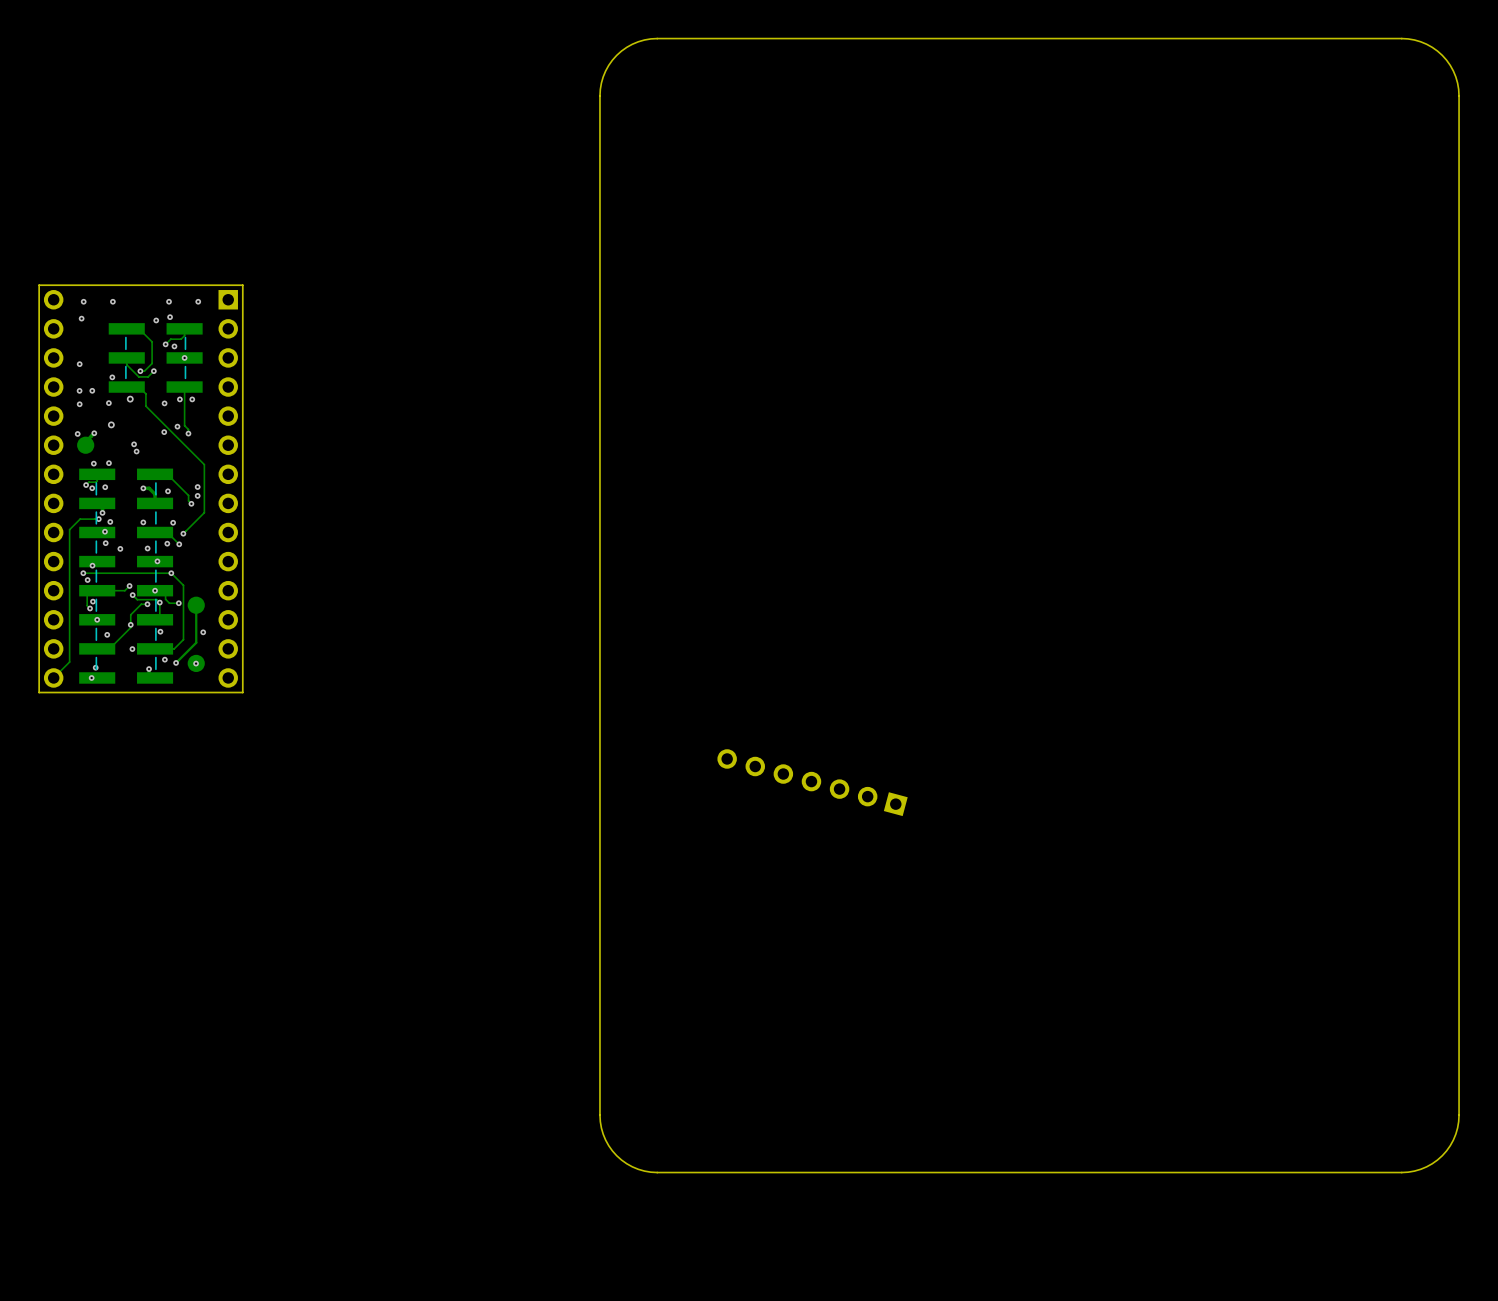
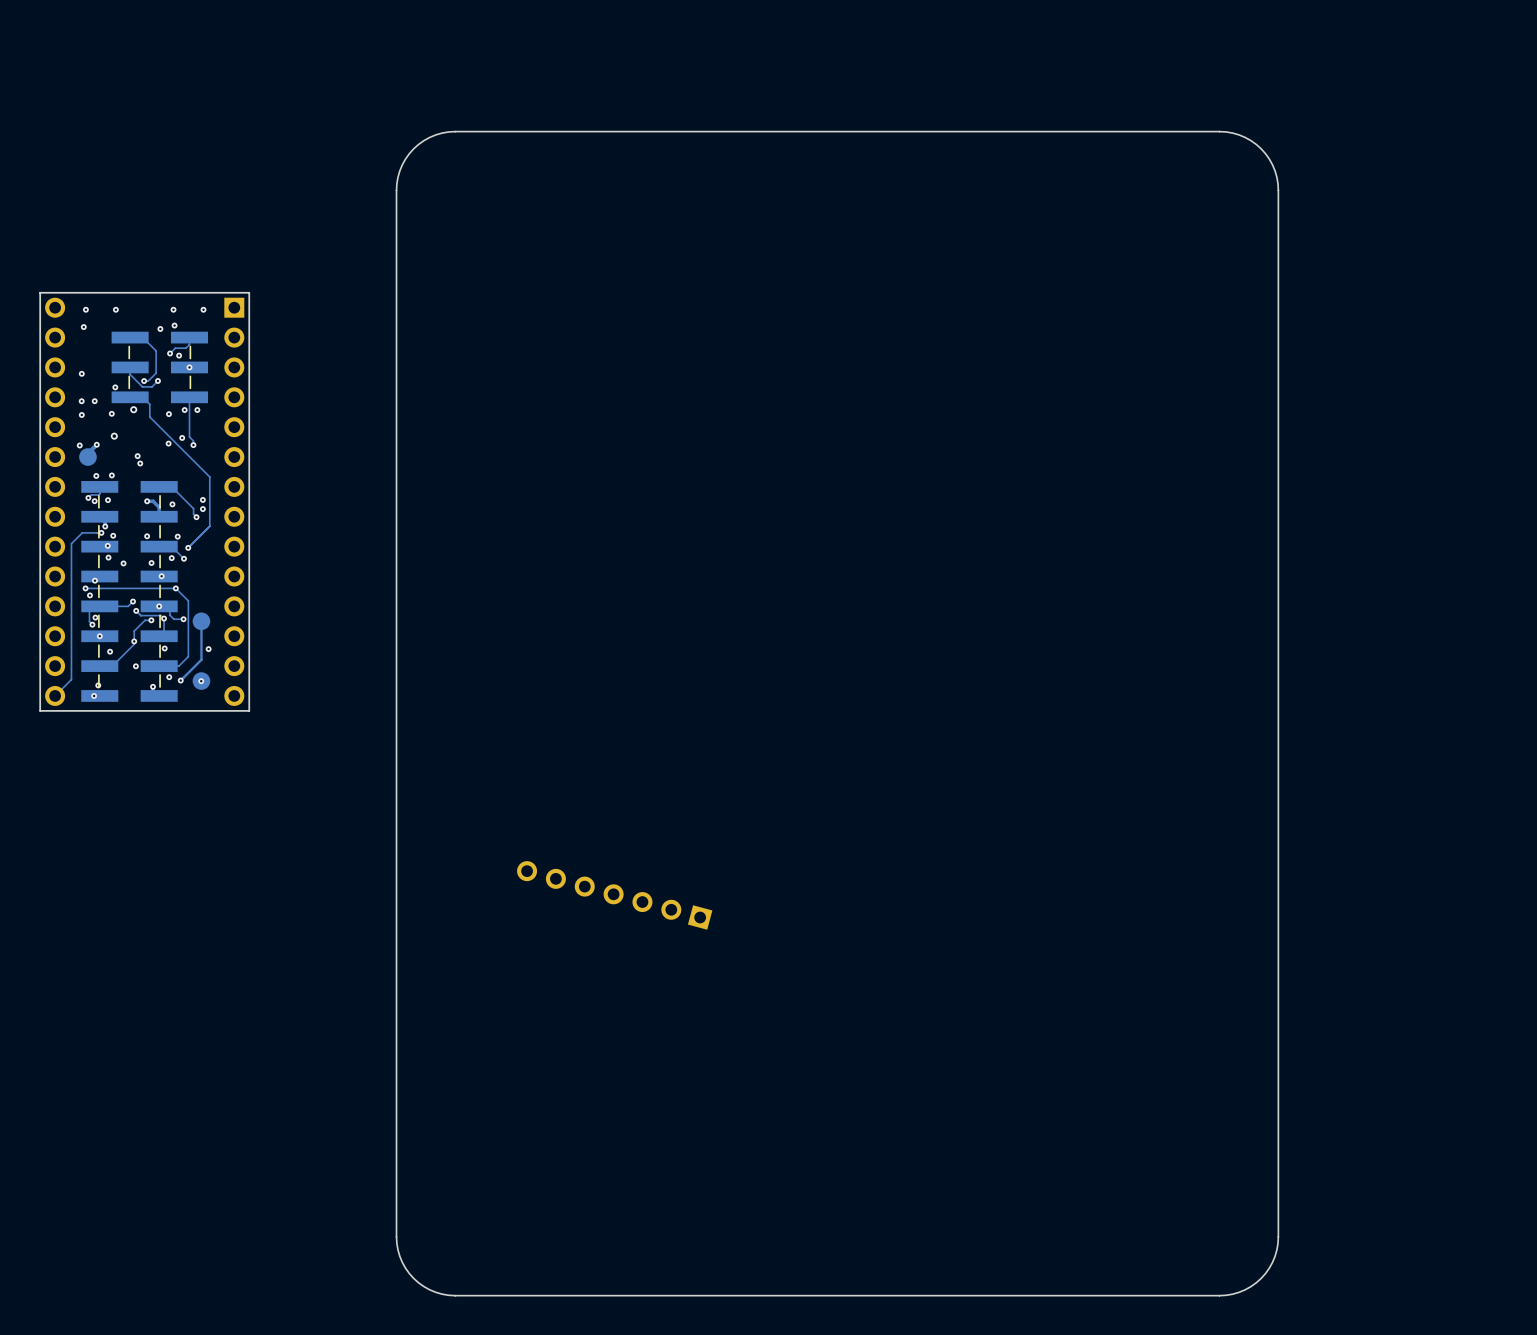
board edge: (1401, 38) (657, 38) (632, 44) (621, 51) (608, 65) (603, 76) (599, 95) (599, 1115) (603, 1134) (608, 1145) (626, 1163) (638, 1169) (657, 1172) (1401, 1172) (1420, 1169) (1432, 1163) (1450, 1145) (1457, 1128) (1459, 1115) (1459, 95) (1455, 76) (1442, 55) (1426, 44) (1401, 38) -> (1219, 131) (455, 131) (442, 133) (424, 140) (405, 159) (399, 170) (396, 190) (396, 1236) (402, 1262) (409, 1273) (424, 1286) (442, 1294) (455, 1295) (1219, 1295) (1245, 1289) (1261, 1278) (1269, 1268) (1276, 1249) (1278, 1236) (1278, 190) (1275, 170) (1261, 148) (1239, 134) (1219, 131)
part position: (812, 782) -> (614, 895)

